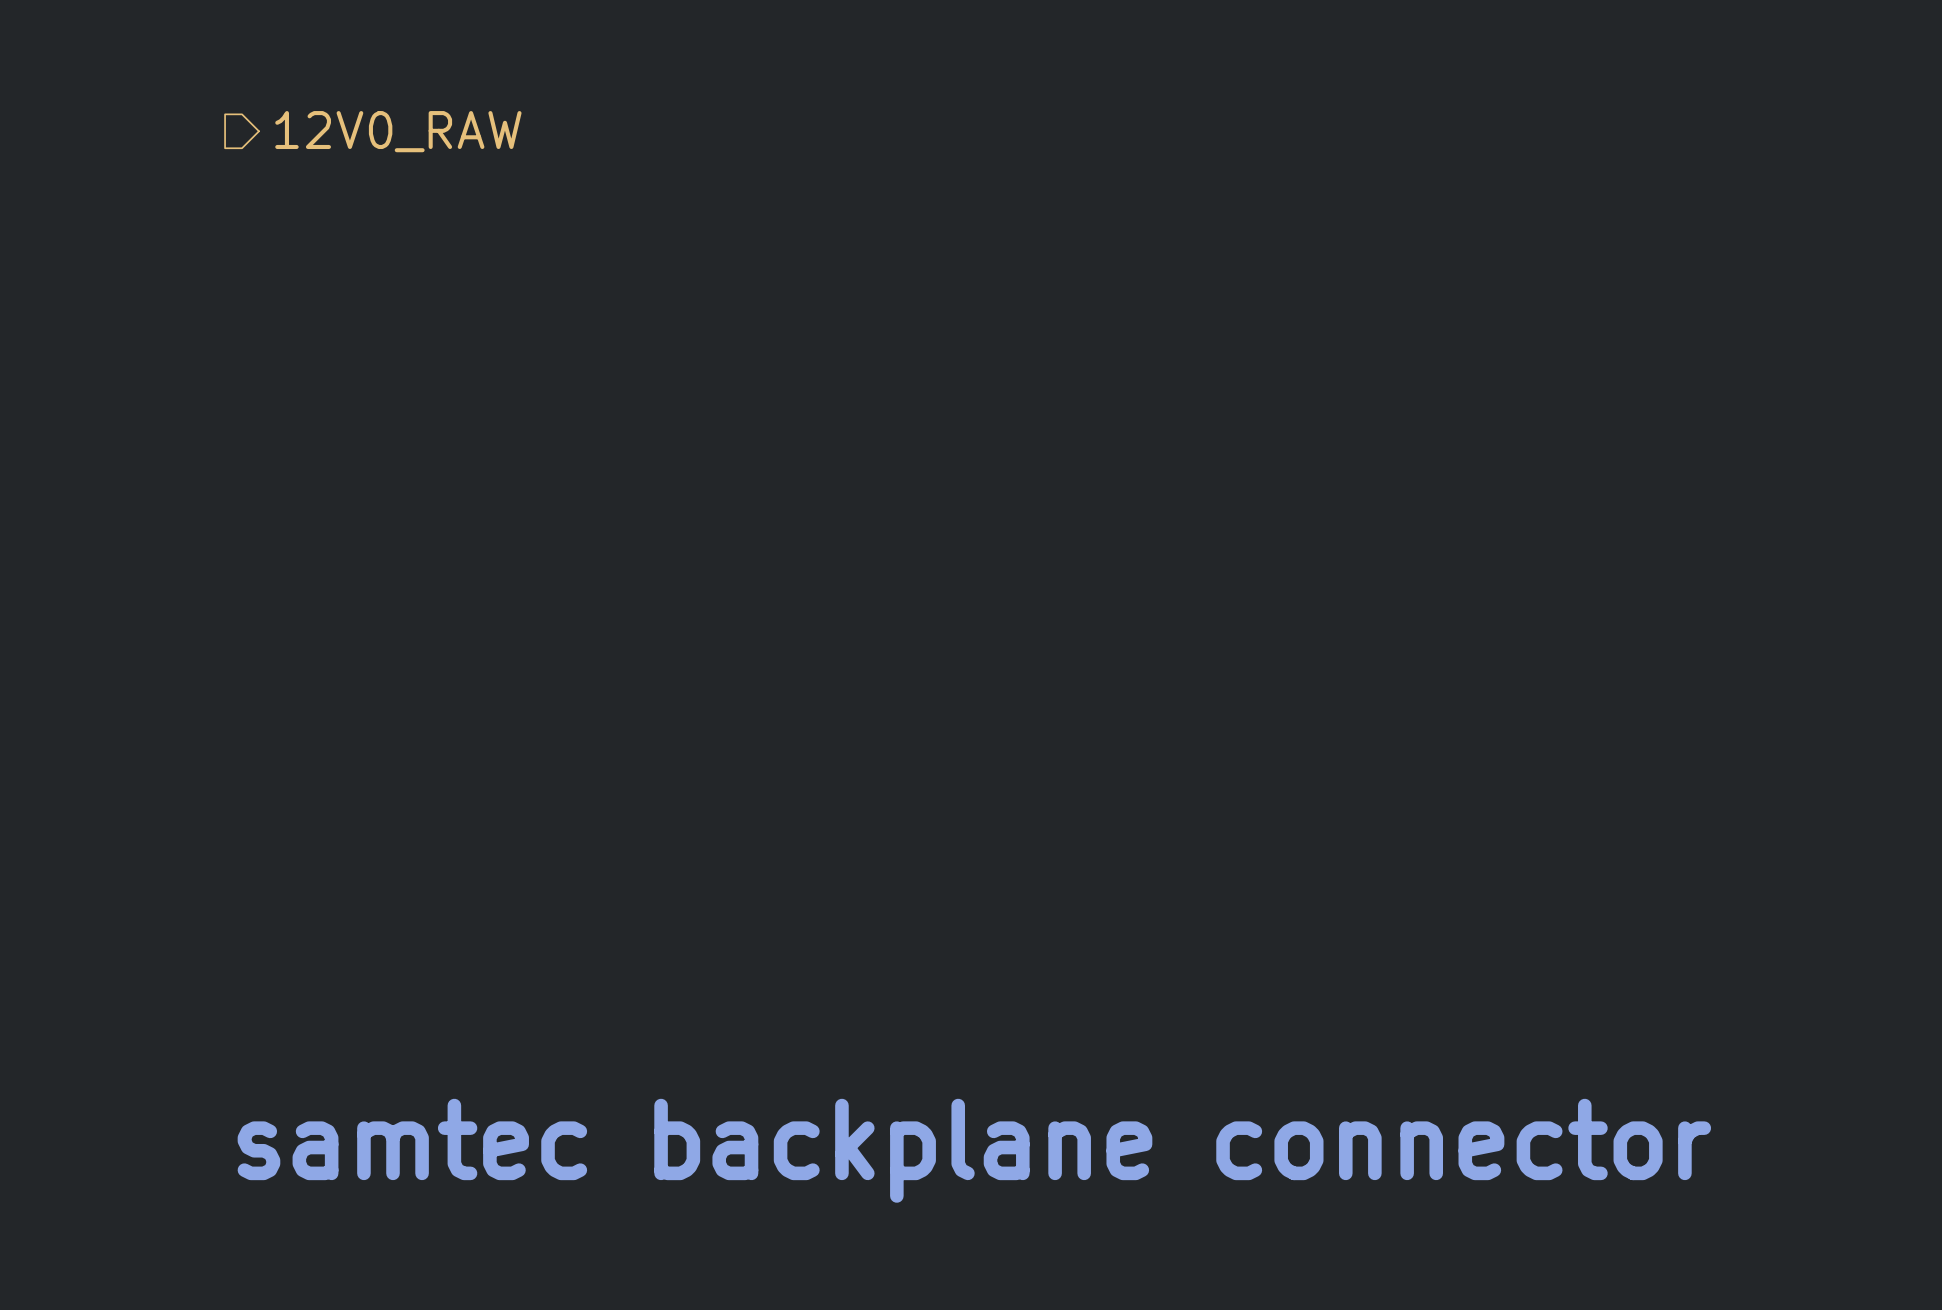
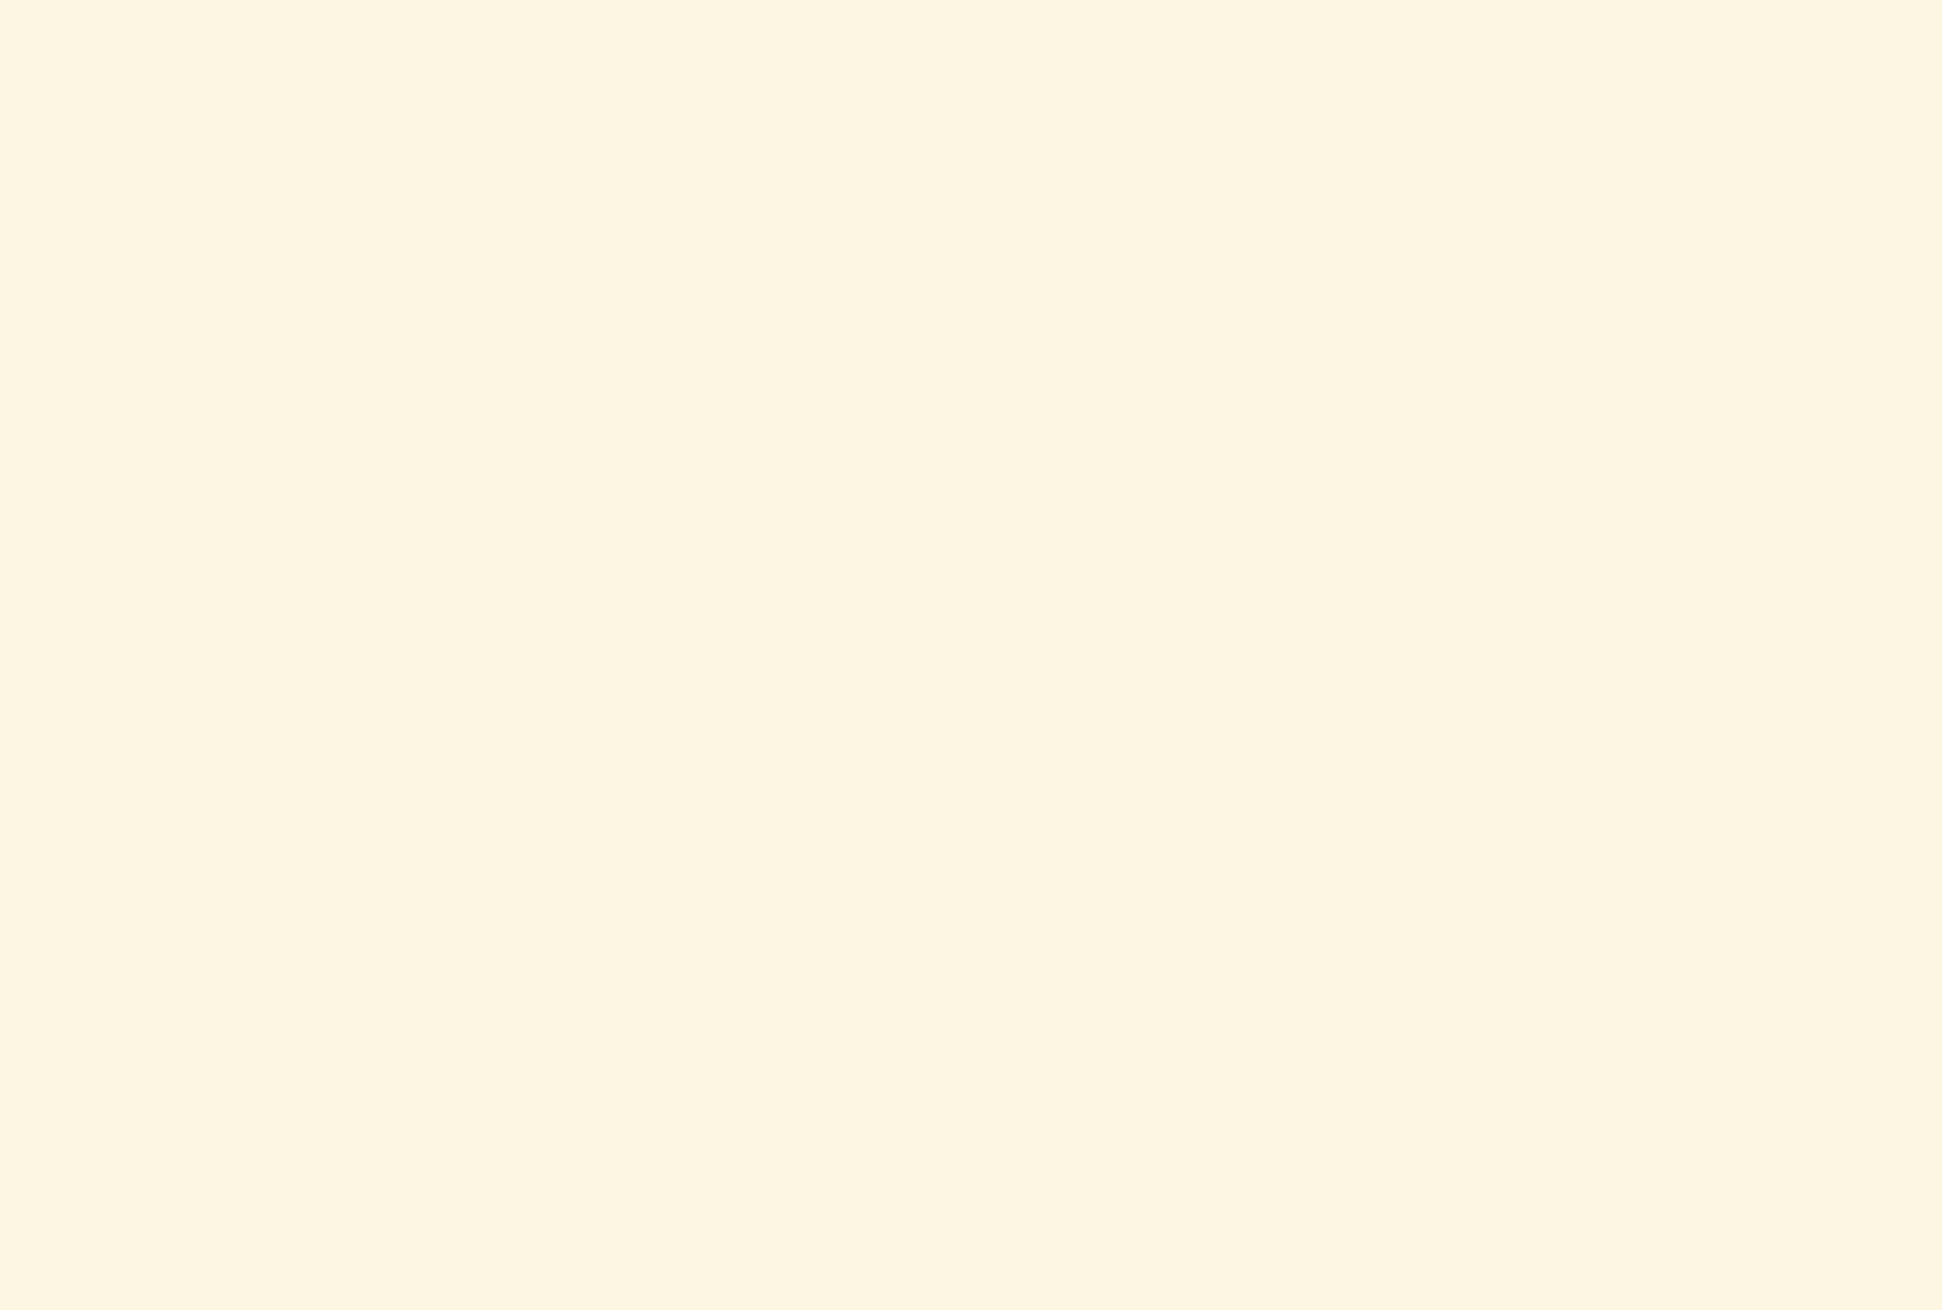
hierarchical label: 12V0_RAW (398, 131) -> none
text: samtec backplane connector (974, 1150) -> none

